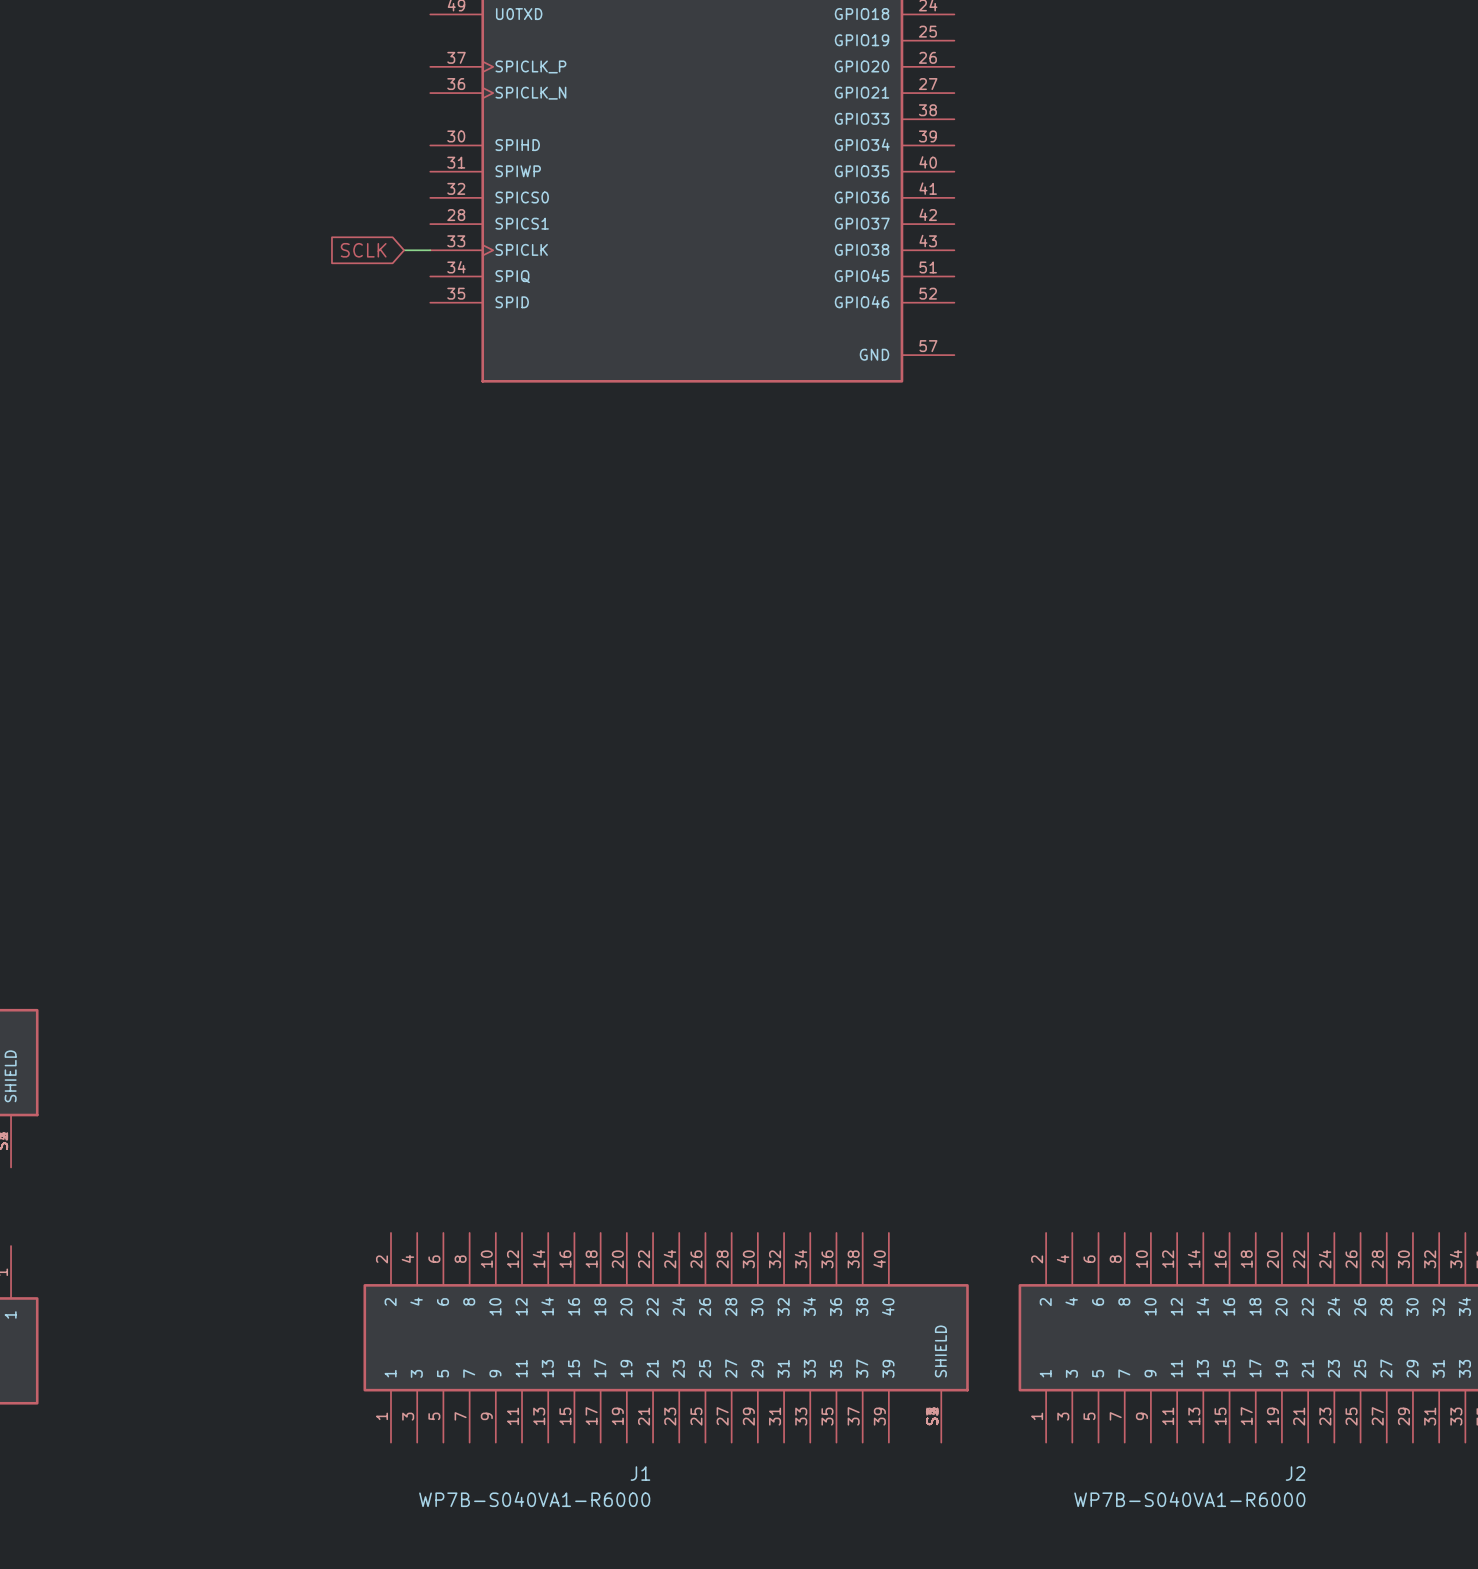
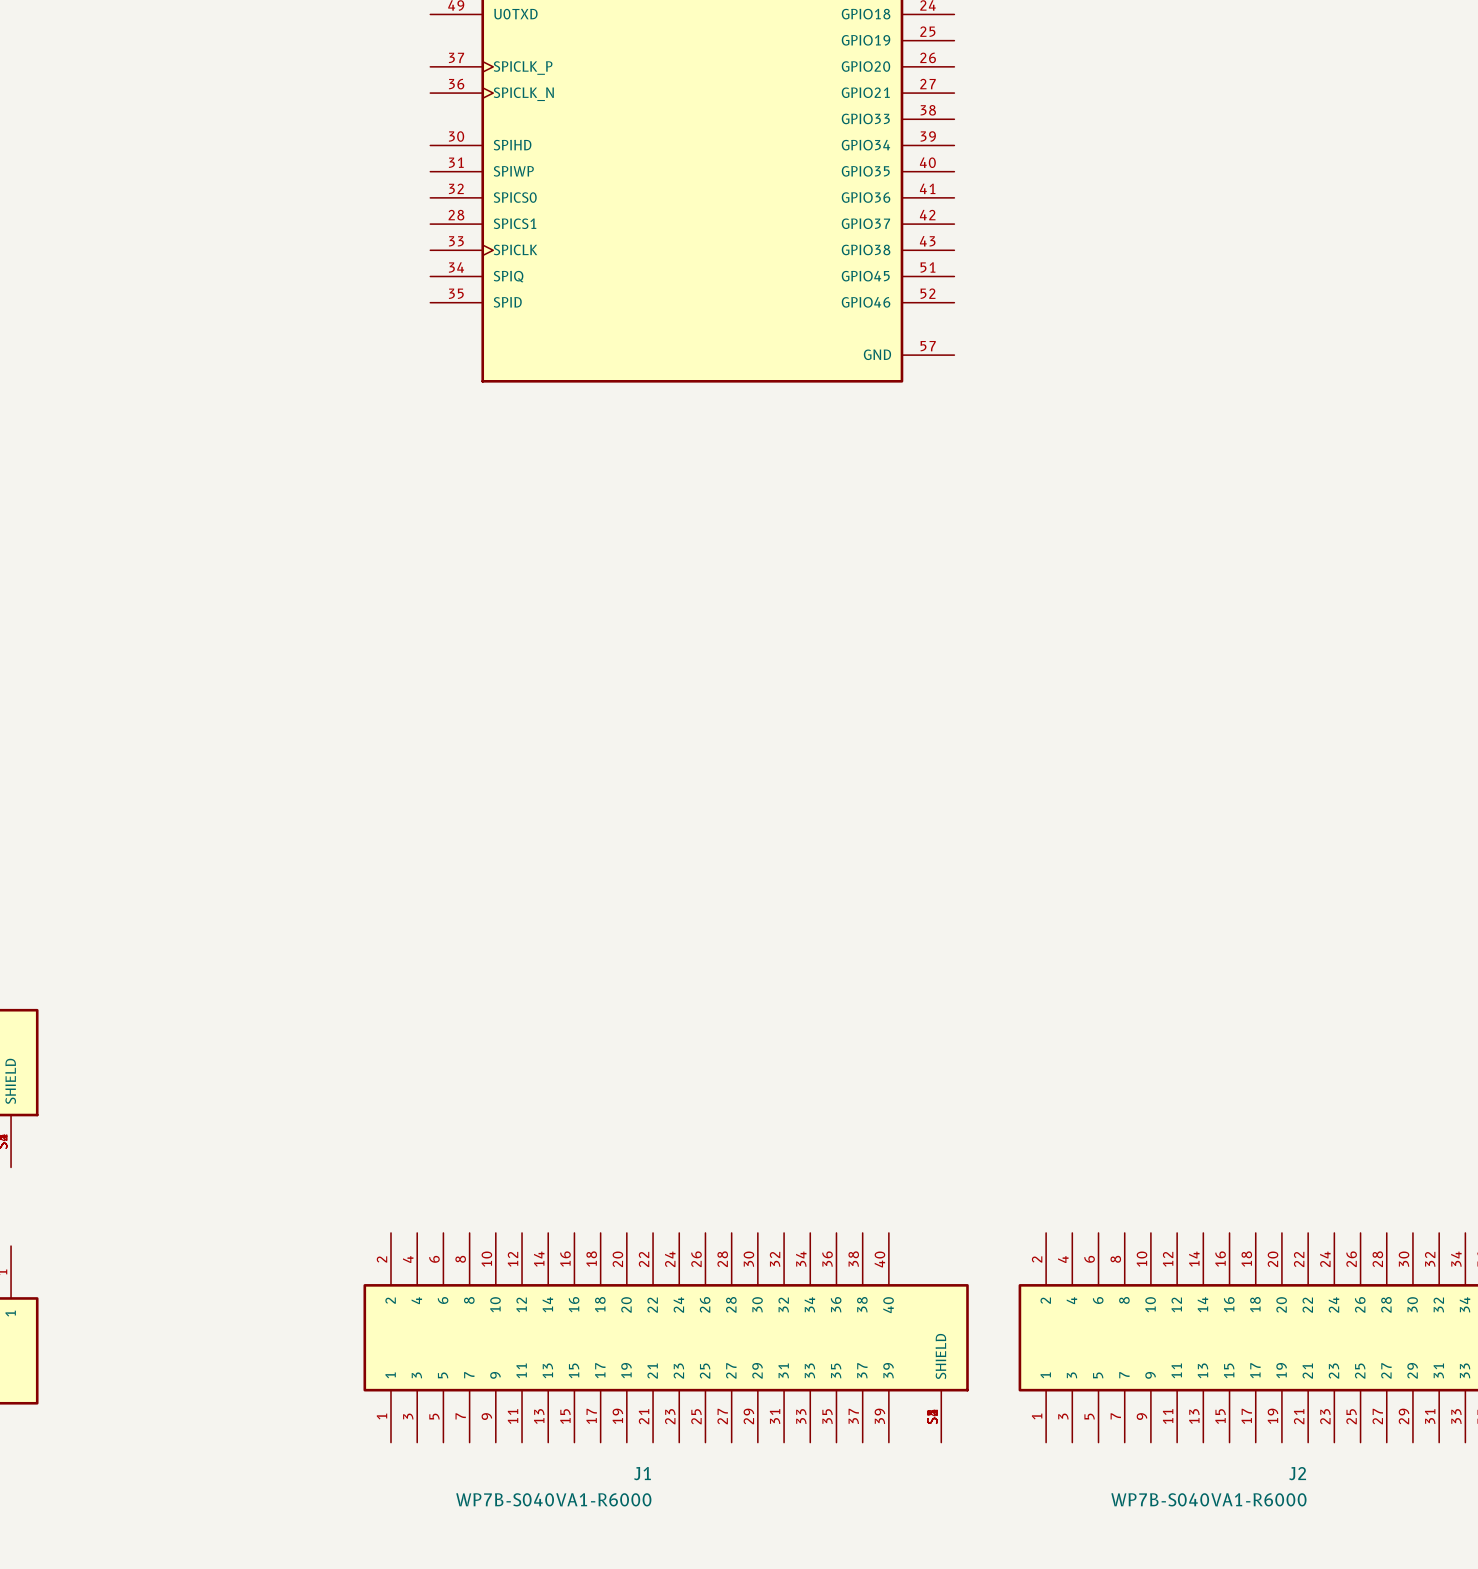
global label: SCLK (363, 250) -> none
wire: (404, 250) (430, 250) -> none

